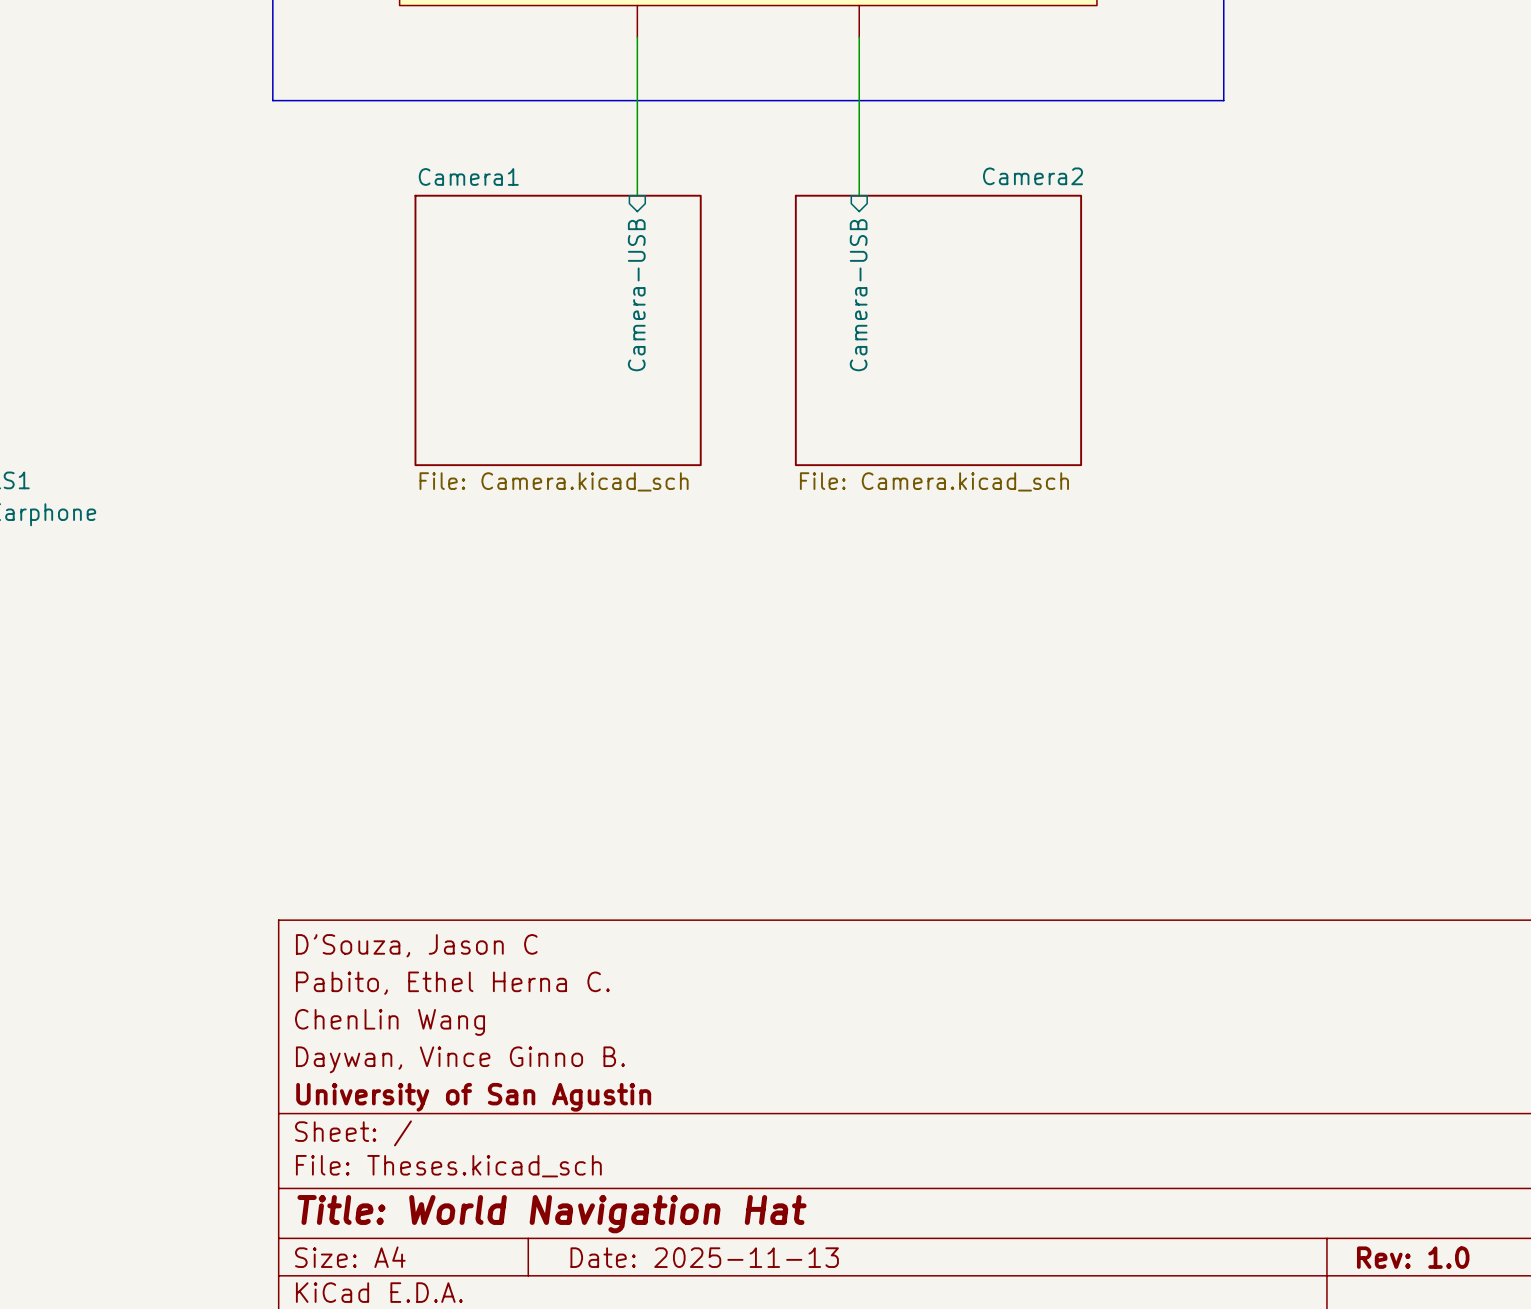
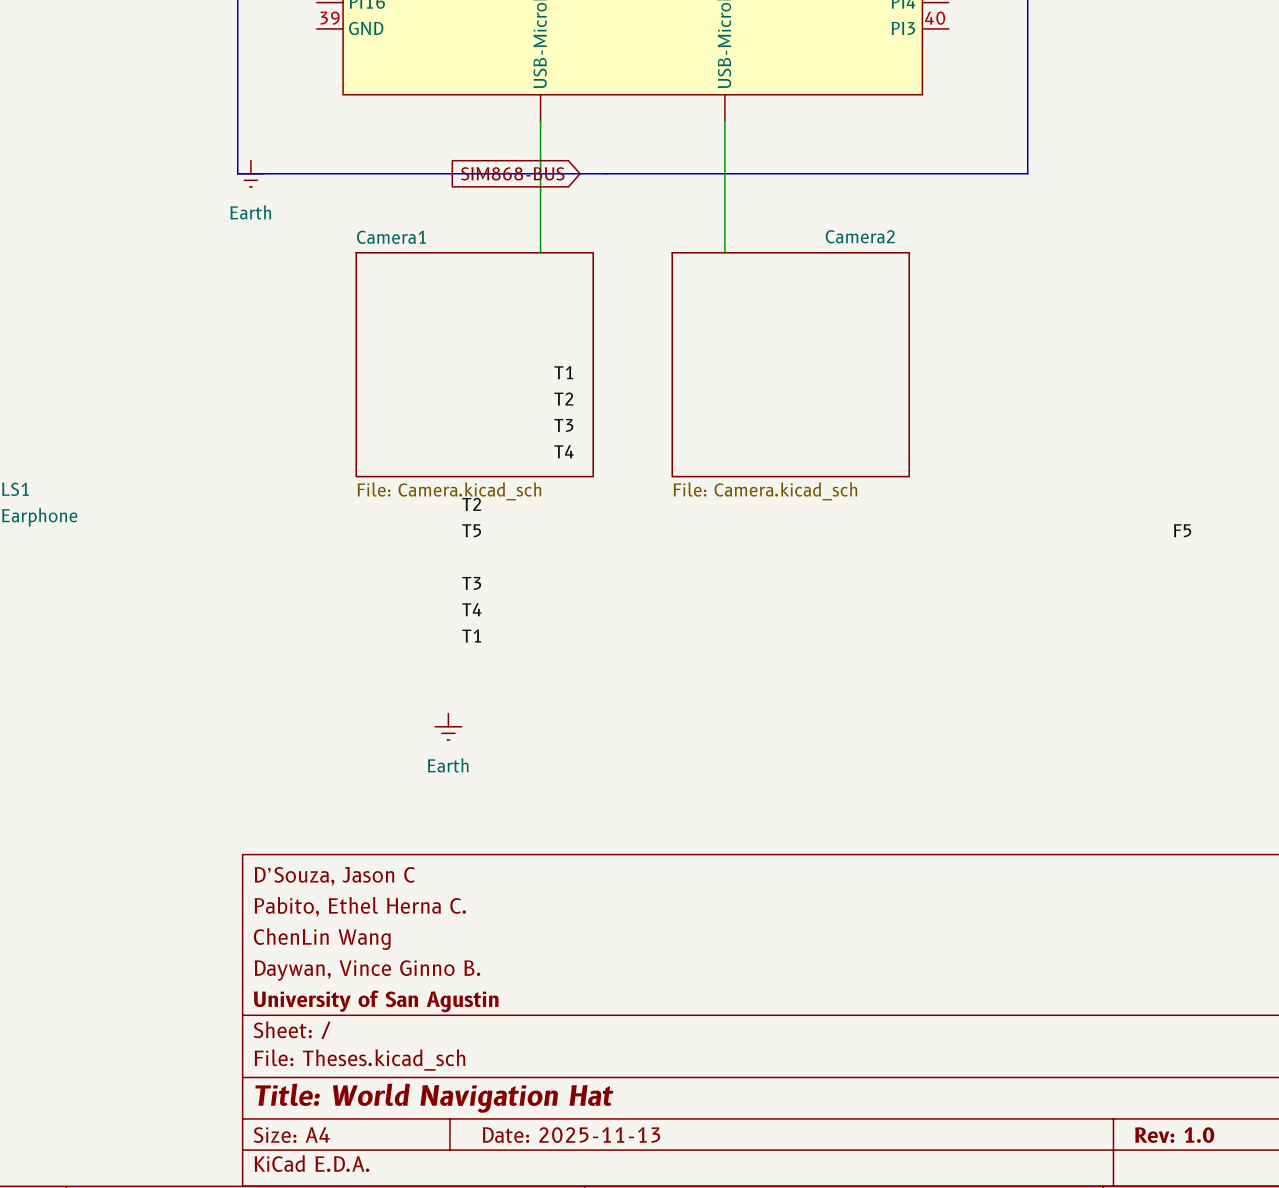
power symbol: none -> Earth (250, 173)
global label: none -> SIM868-BUS (512, 173)
sheet pin: Camera-USB (636, 295) -> none
sheet pin: Camera-USB (858, 295) -> none
label: none -> T1 (563, 372)
label: none -> T2 (563, 399)
label: none -> T3 (563, 425)
label: none -> T4 (564, 451)
label: none -> T2 (471, 504)
label: none -> T5 (471, 530)
label: none -> F5 (1182, 530)
label: none -> T3 (471, 583)
label: none -> T4 (471, 609)
label: none -> T1 (471, 636)
power symbol: none -> Earth (448, 726)

